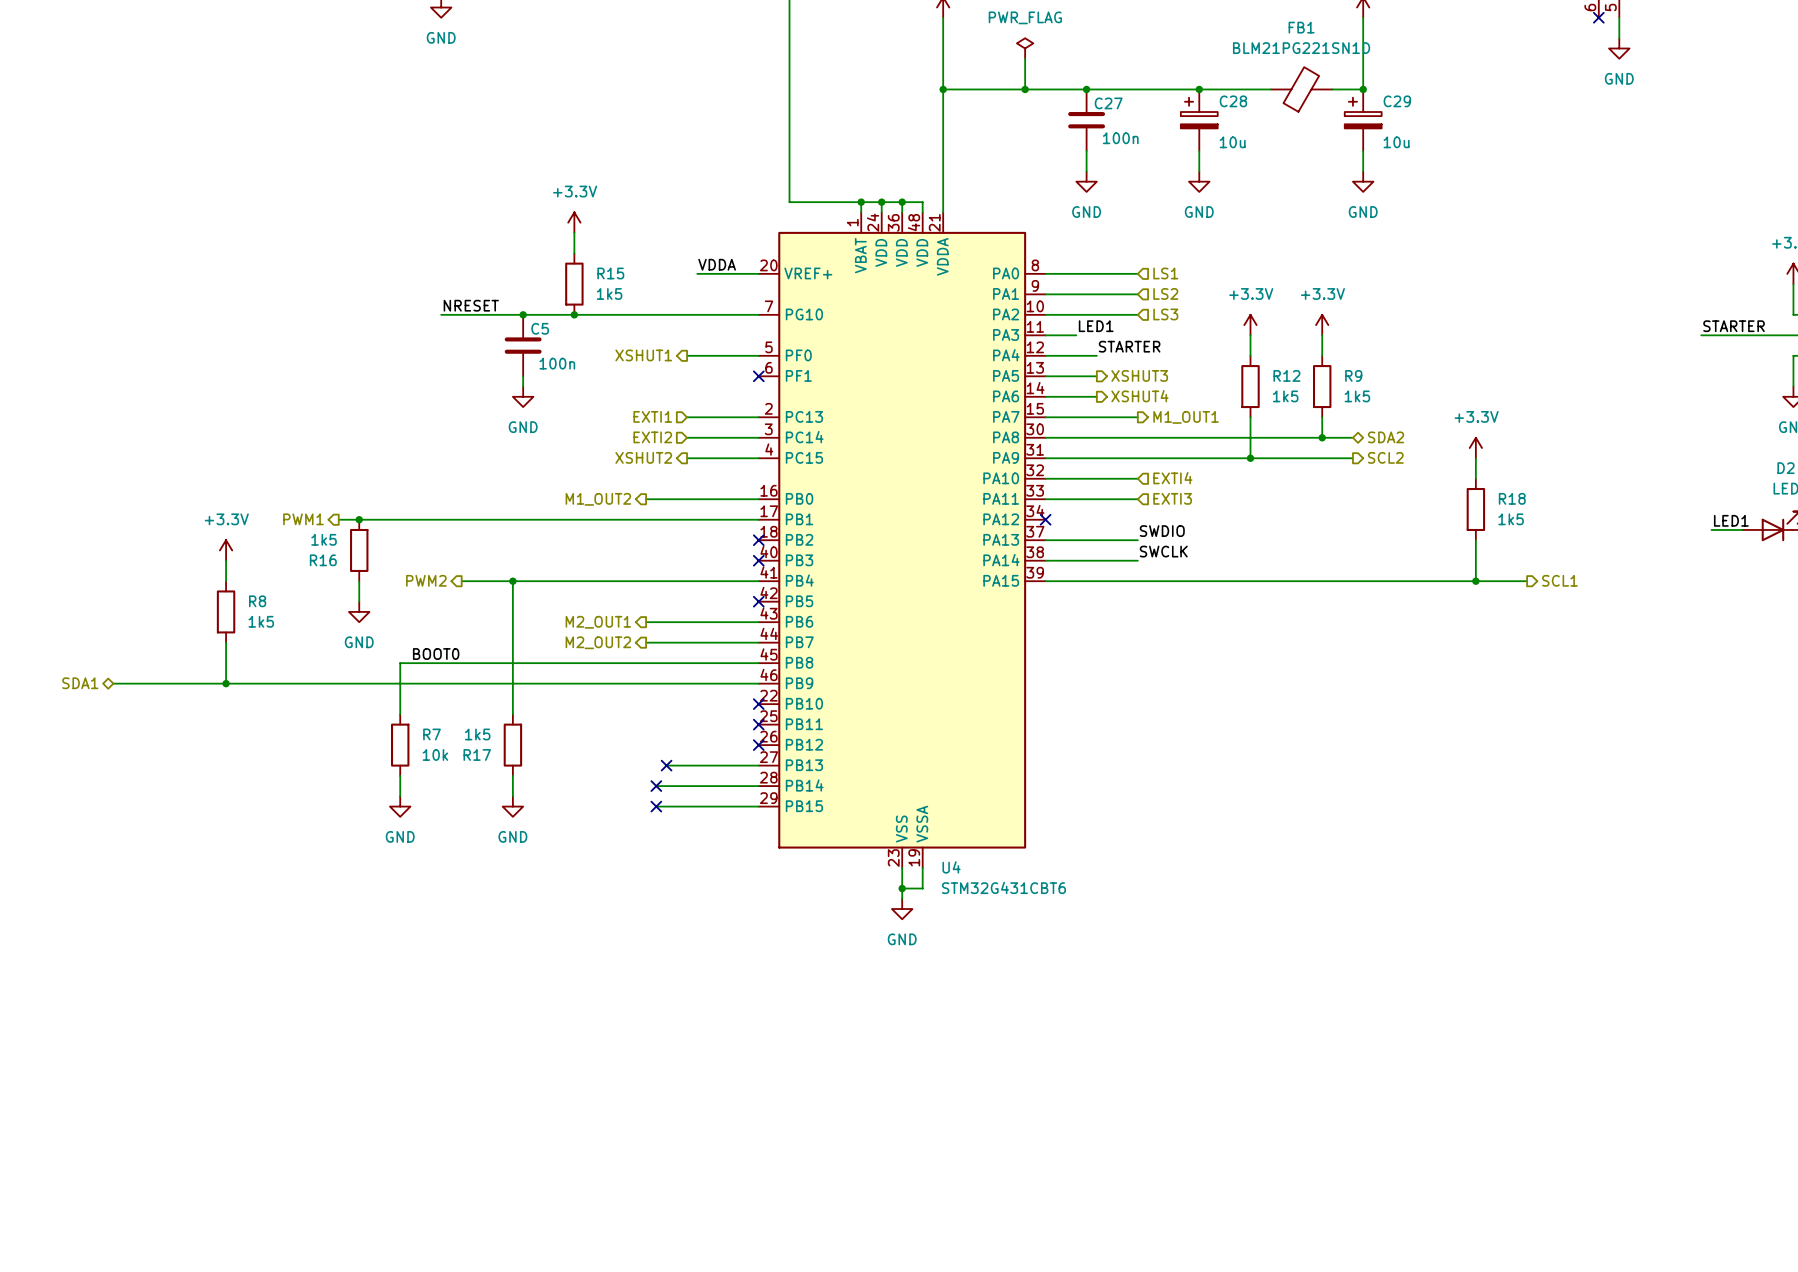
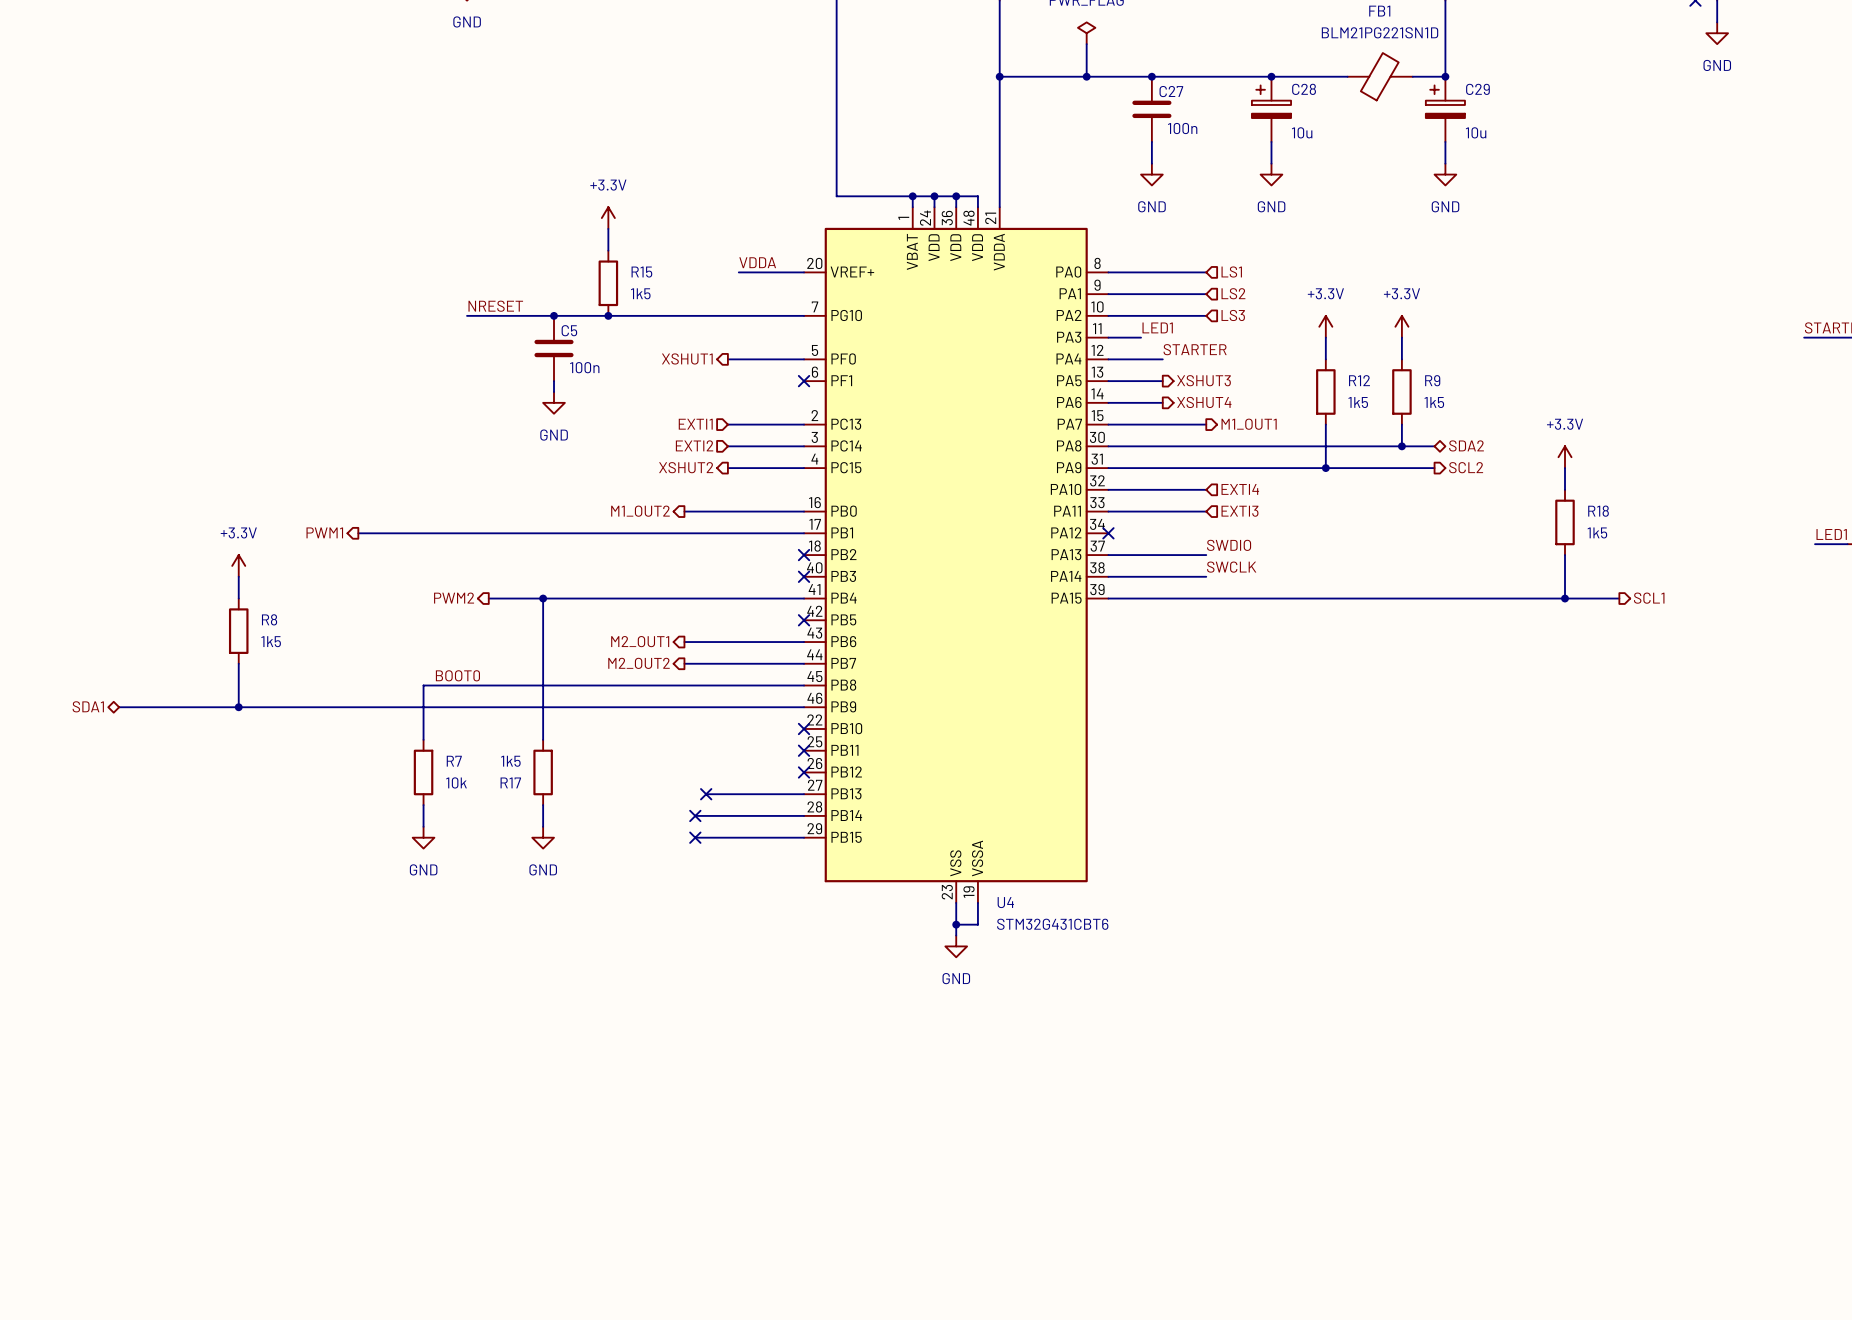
junction: (359, 519) -> none
R16: 1k5 (359, 550) -> none
wire: (359, 581) (359, 601) -> none
power symbol: GND (359, 611) -> none

